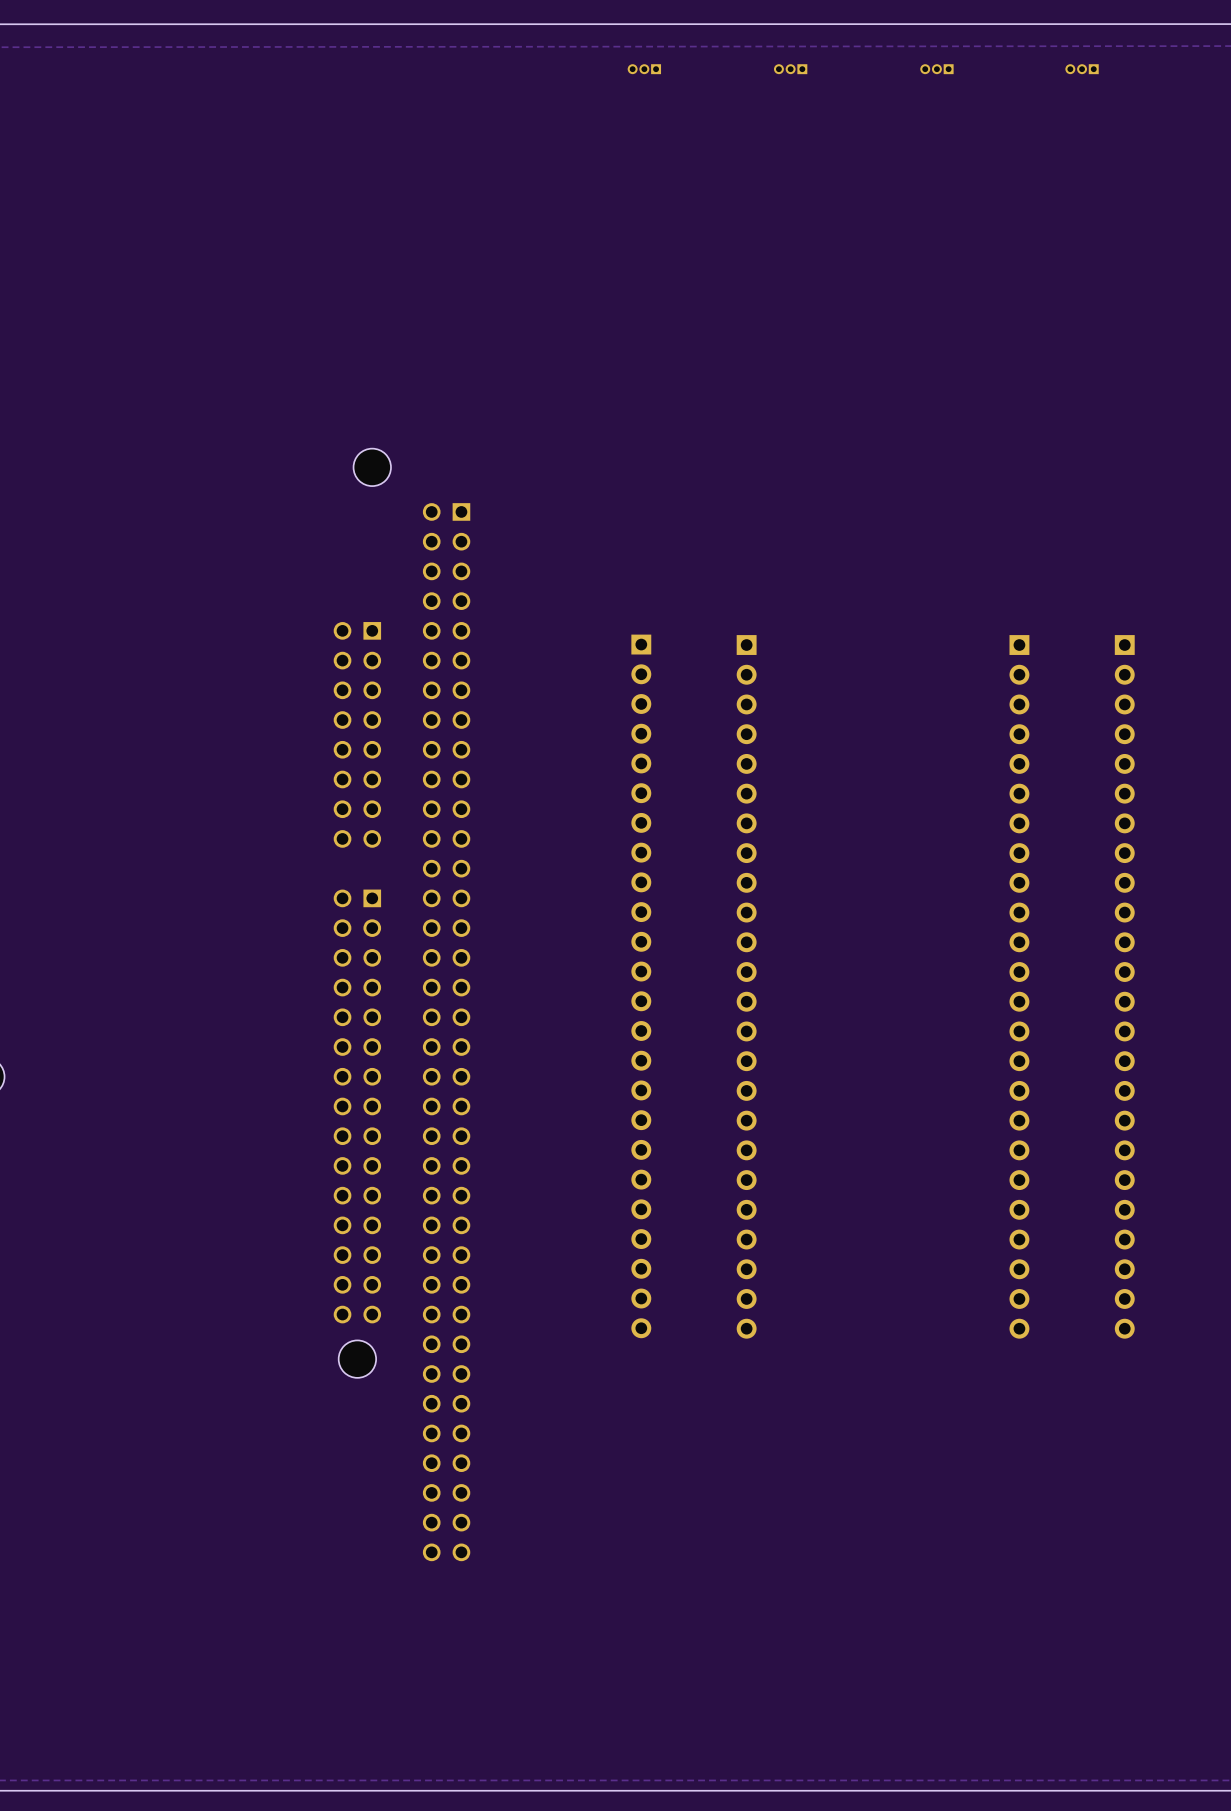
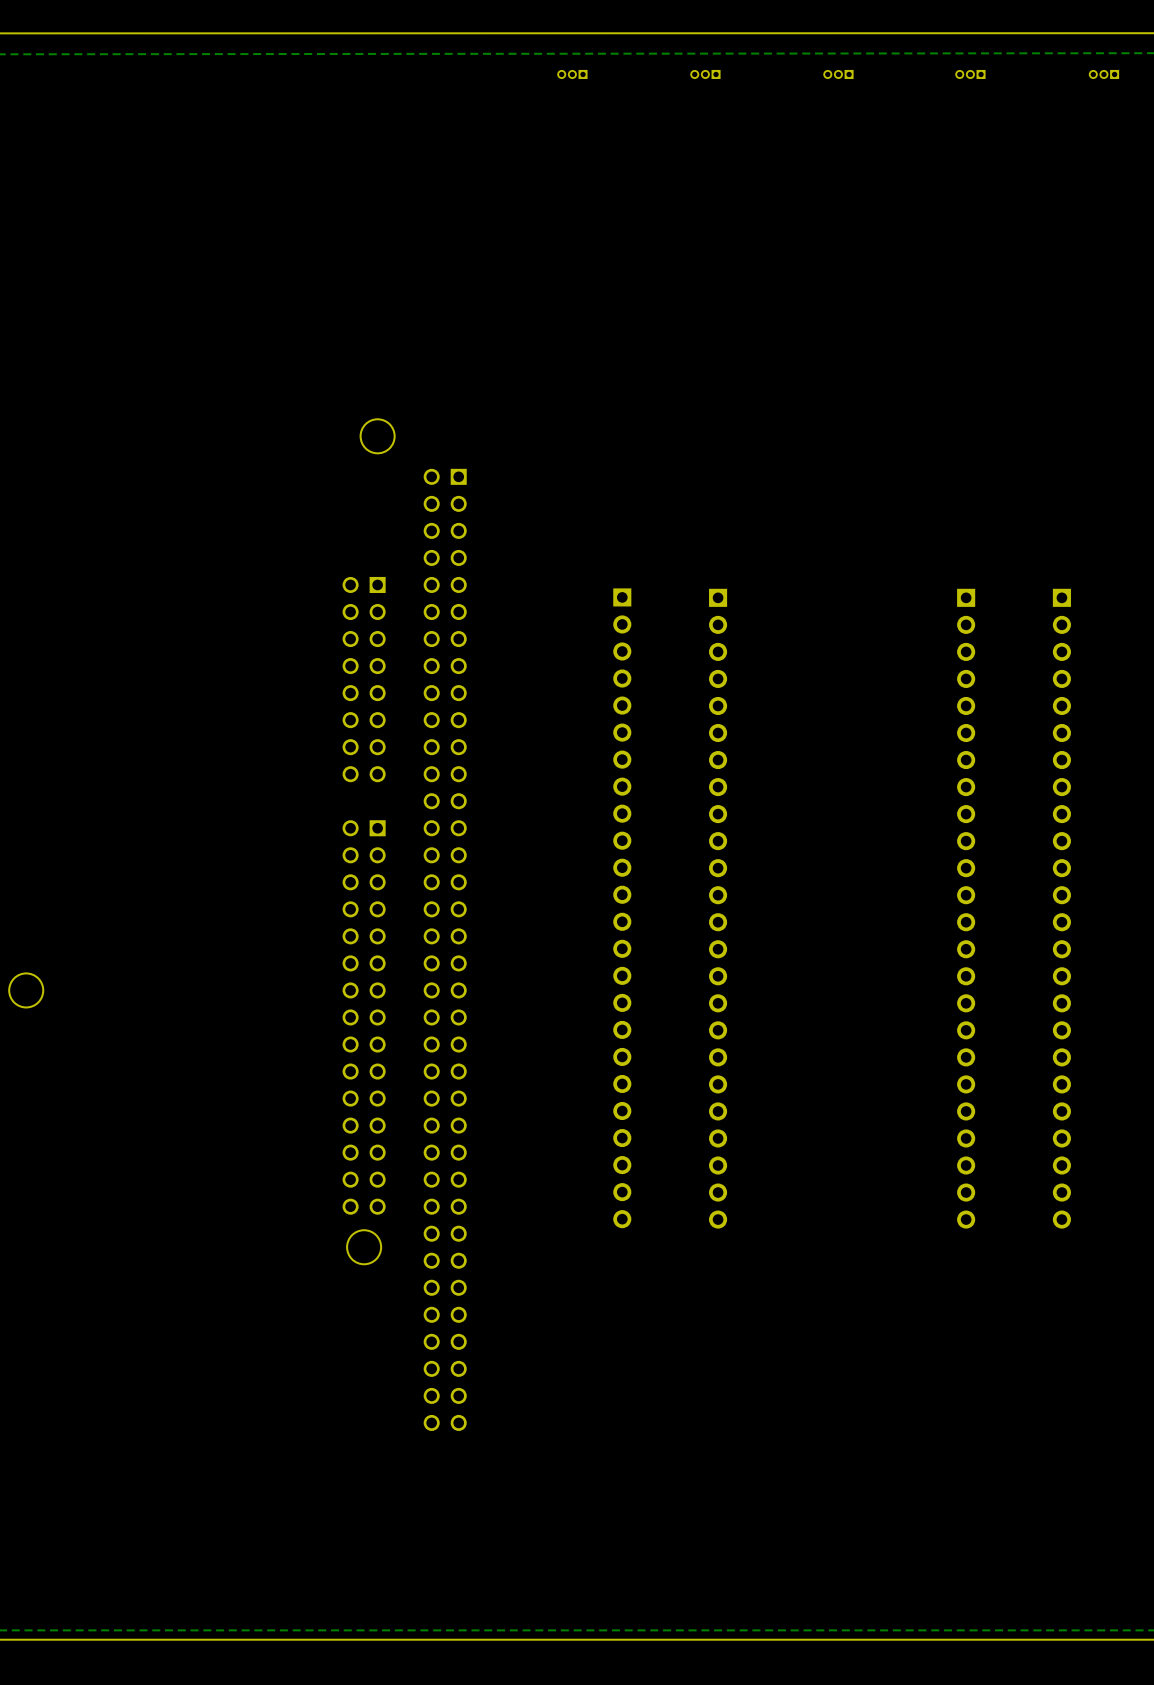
part: none -> (572, 74)
part: (644, 69) -> none
part: none -> (705, 74)
part: (790, 69) -> none
part: none -> (838, 74)
part: (936, 69) -> none
part: none -> (970, 74)
part: (1082, 69) -> none
part: none -> (1103, 74)

